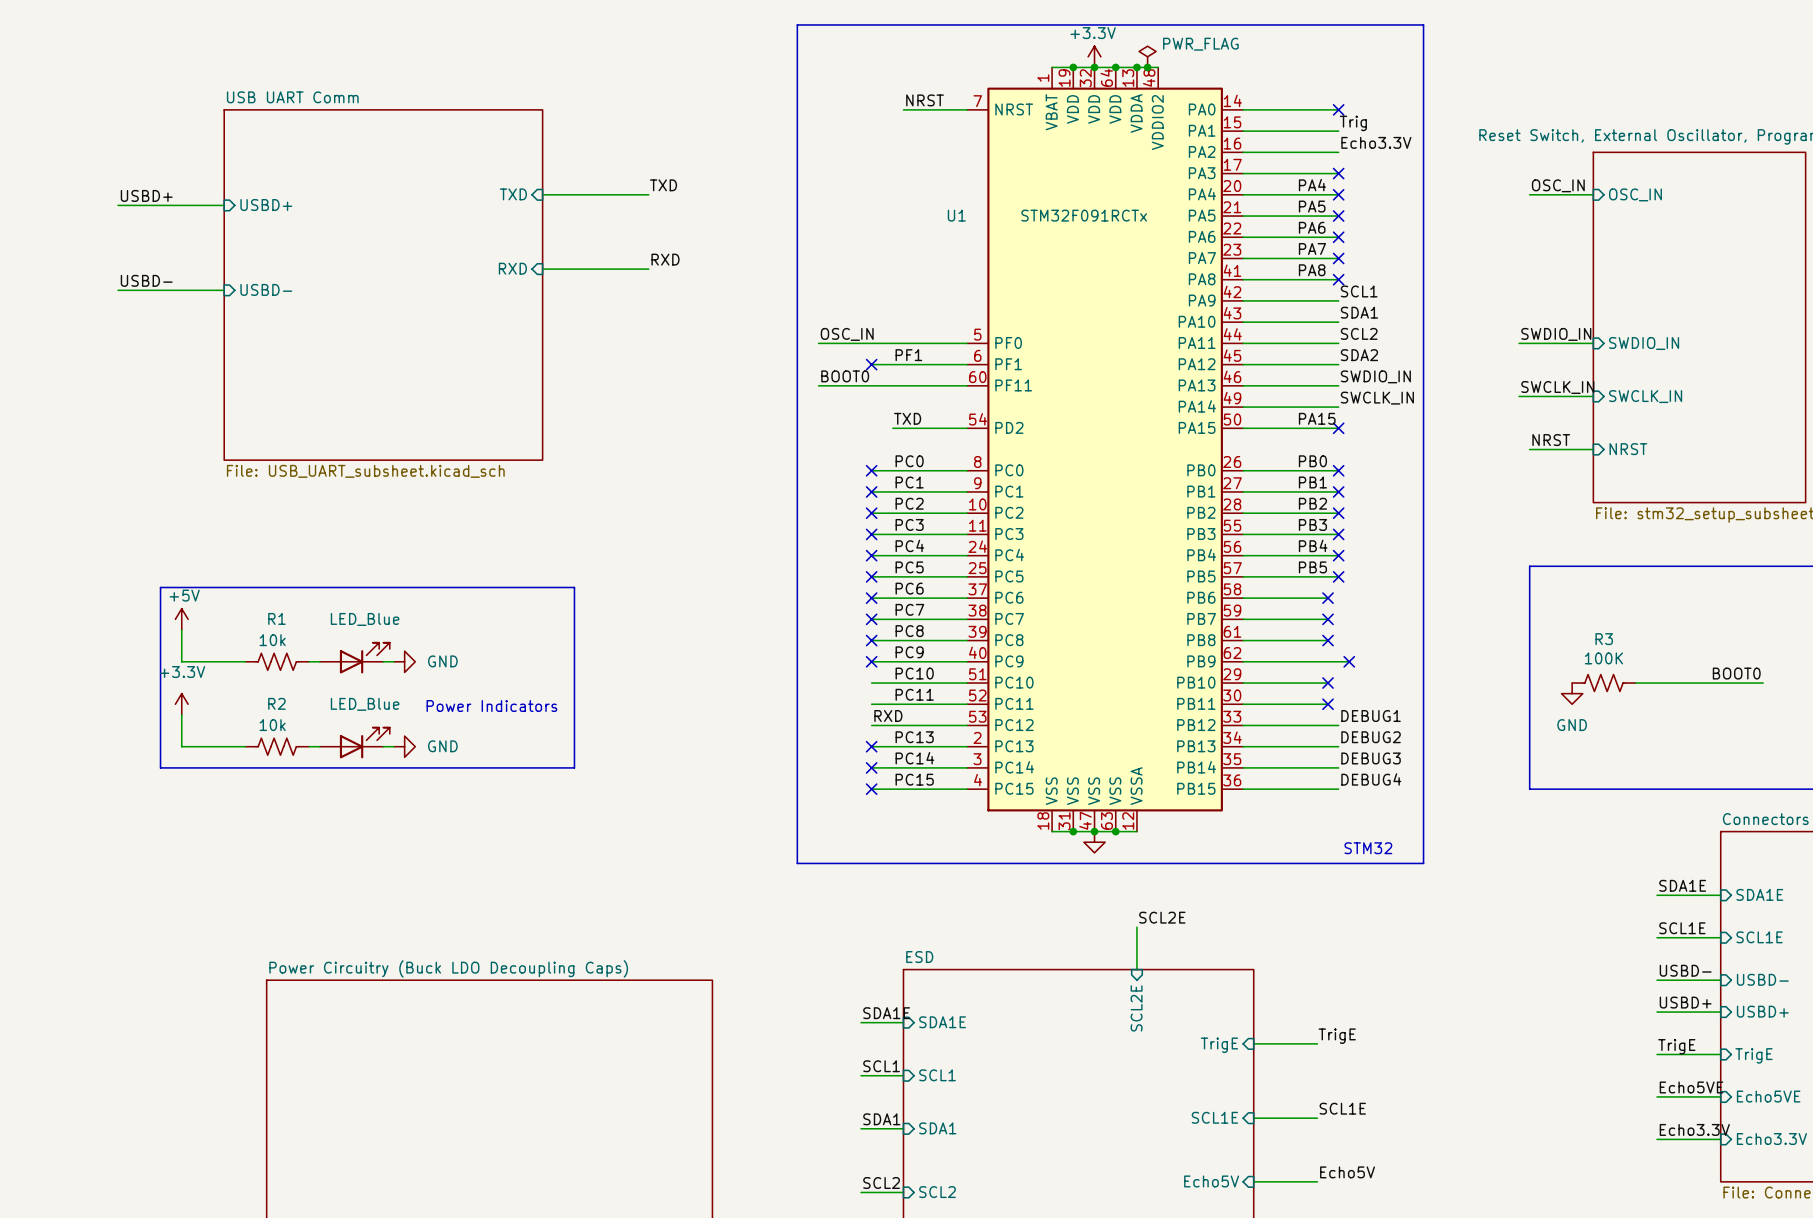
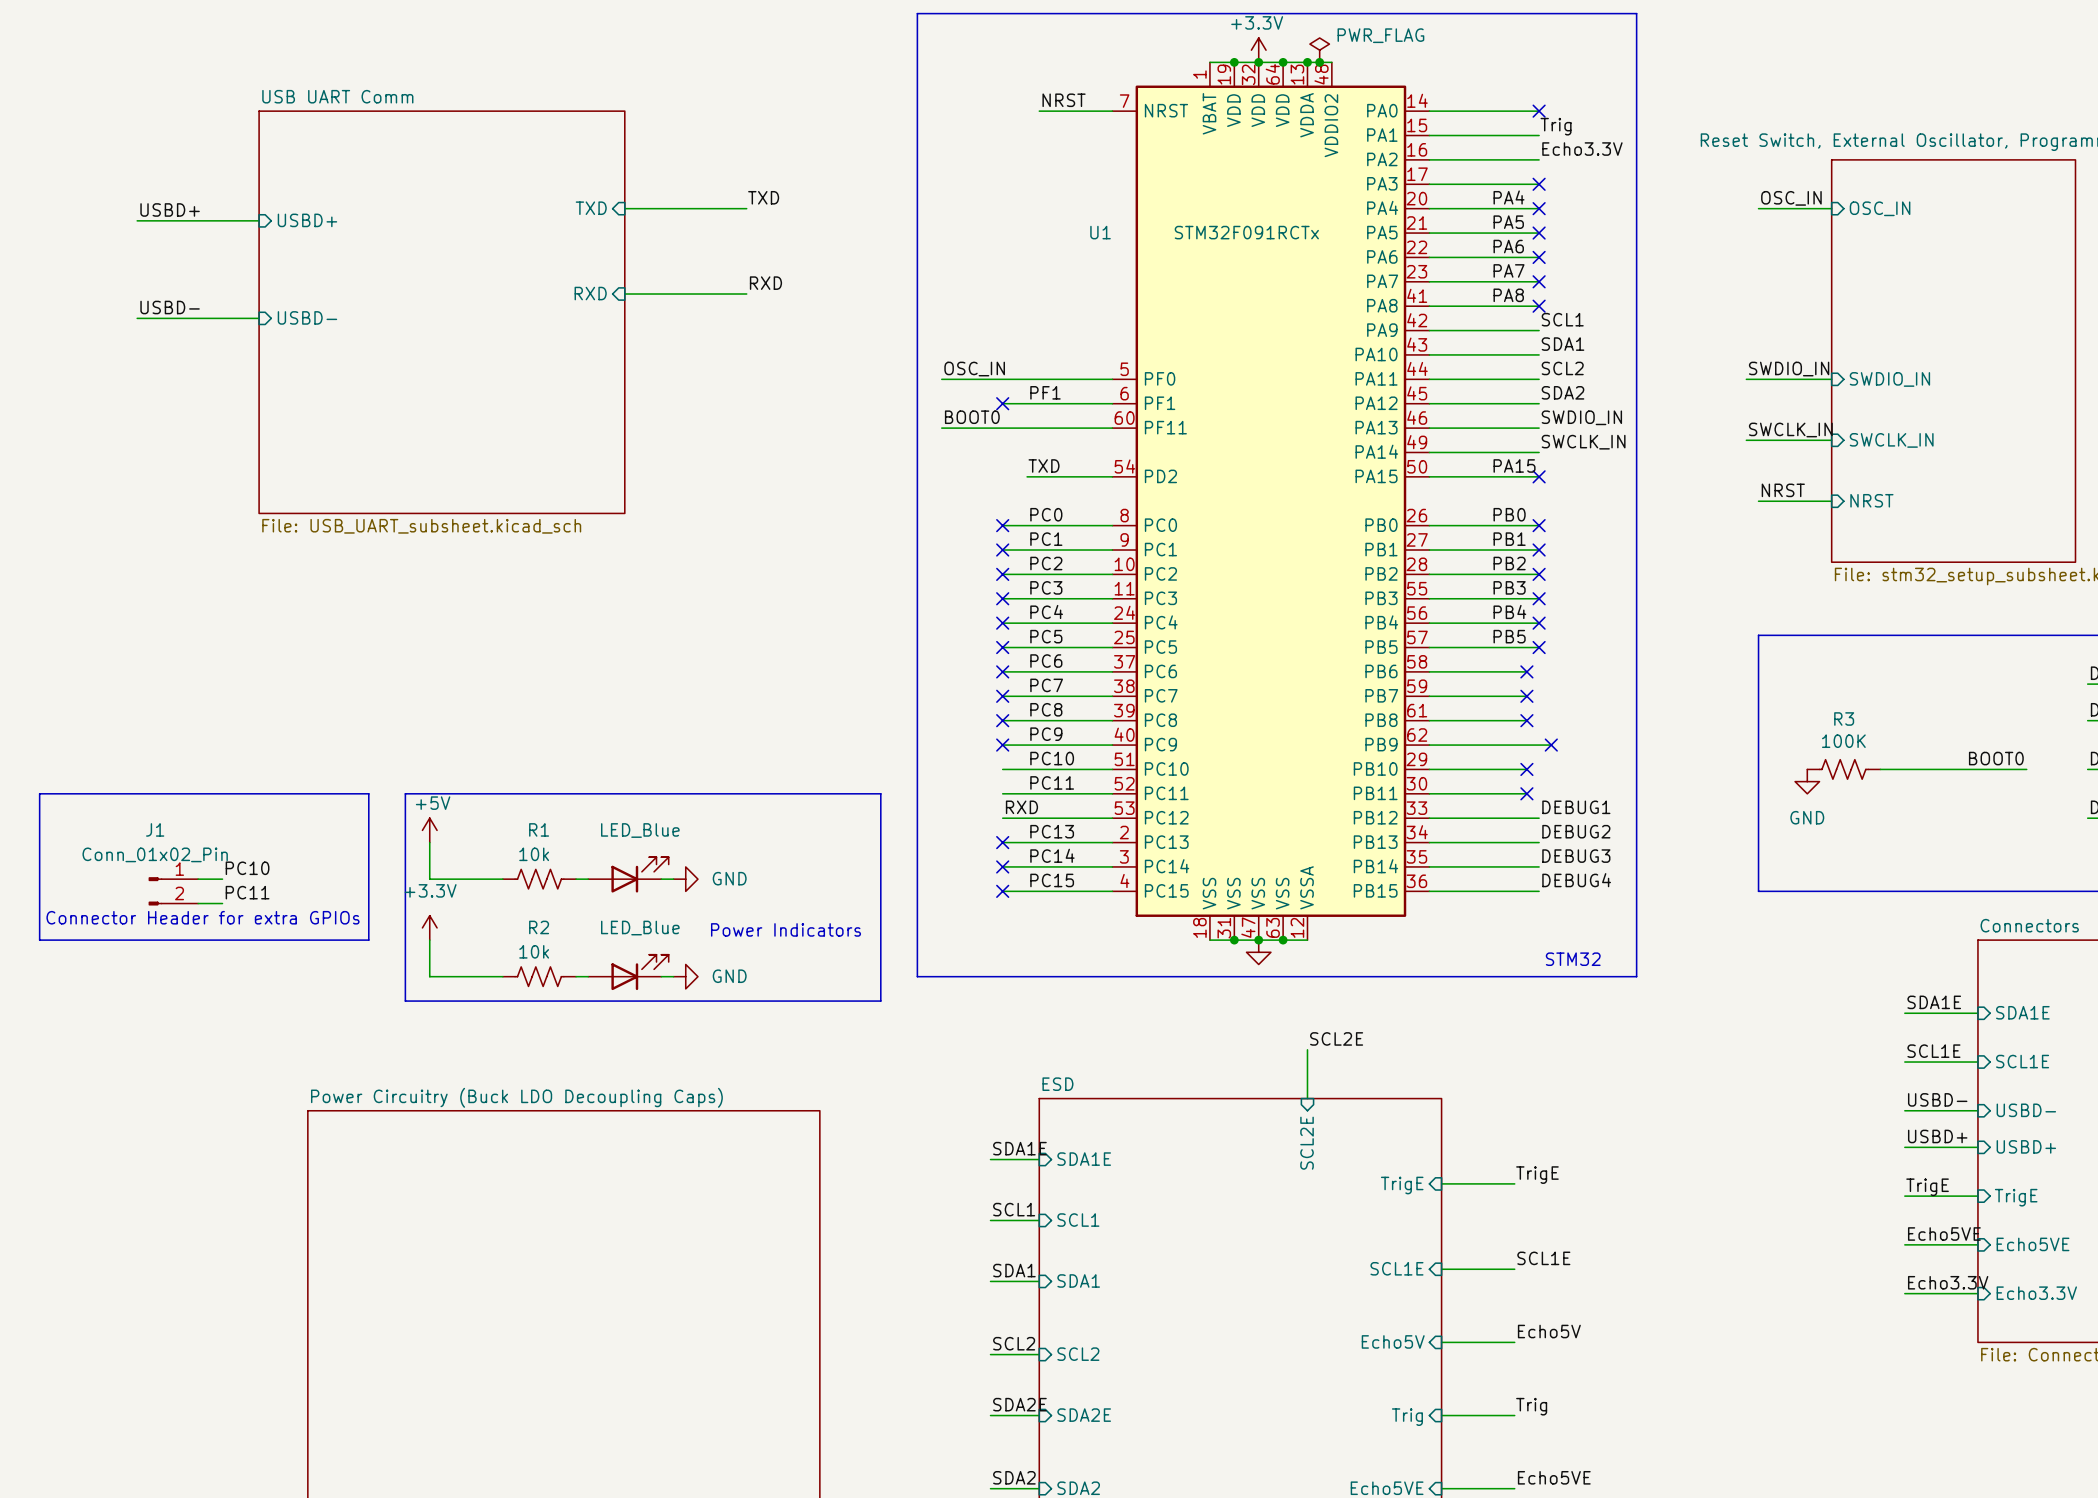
line: (160, 587) (574, 587) (574, 767) (160, 767) (160, 587) -> none
power symbol: +5V (181, 619) -> none
wire: (181, 629) (181, 661) (245, 661) -> none
part: LED_Blue (354, 658) -> none
R1 position: (277, 661) -> (539, 879)
wire: (309, 661) (319, 661) -> none
wire: (383, 661) (394, 661) -> none
power symbol: GND (404, 661) -> none
line: none -> (39, 793) (368, 793) (368, 940) (39, 940) (39, 793)
power symbol: +3.3V (181, 704) -> none
line: none -> (405, 793) (880, 793) (880, 1001) (405, 1001) (405, 793)
text: Power Indicators (491, 706) -> none
wire: (181, 714) (181, 746) (245, 746) -> (429, 842) (429, 879) (502, 879)
power symbol: none -> +5V (429, 830)
part: LED_Blue (354, 742) -> none
R2 position: (277, 746) -> (539, 976)
wire: (309, 746) (319, 746) -> (576, 879) (588, 879)
wire: (383, 746) (394, 746) -> (661, 879) (673, 879)
power symbol: GND (404, 746) -> none
label: none -> PC10 (247, 868)
part: none -> LED_Blue (628, 874)
wire: none -> (198, 879) (222, 879)
power symbol: none -> GND (685, 879)
J1: none -> Conn_01x02_Pin (173, 891)
label: none -> PC11 (247, 892)
wire: none -> (198, 903) (222, 903)
text: none -> Connector Header for extra GPIOs (203, 917)
power symbol: none -> +3.3V (429, 927)
text: none -> Power Indicators (786, 929)
wire: none -> (429, 940) (429, 976) (502, 976)
part: none -> LED_Blue (628, 972)
wire: none -> (576, 976) (588, 976)
wire: none -> (661, 976) (673, 976)
power symbol: none -> GND (685, 976)

